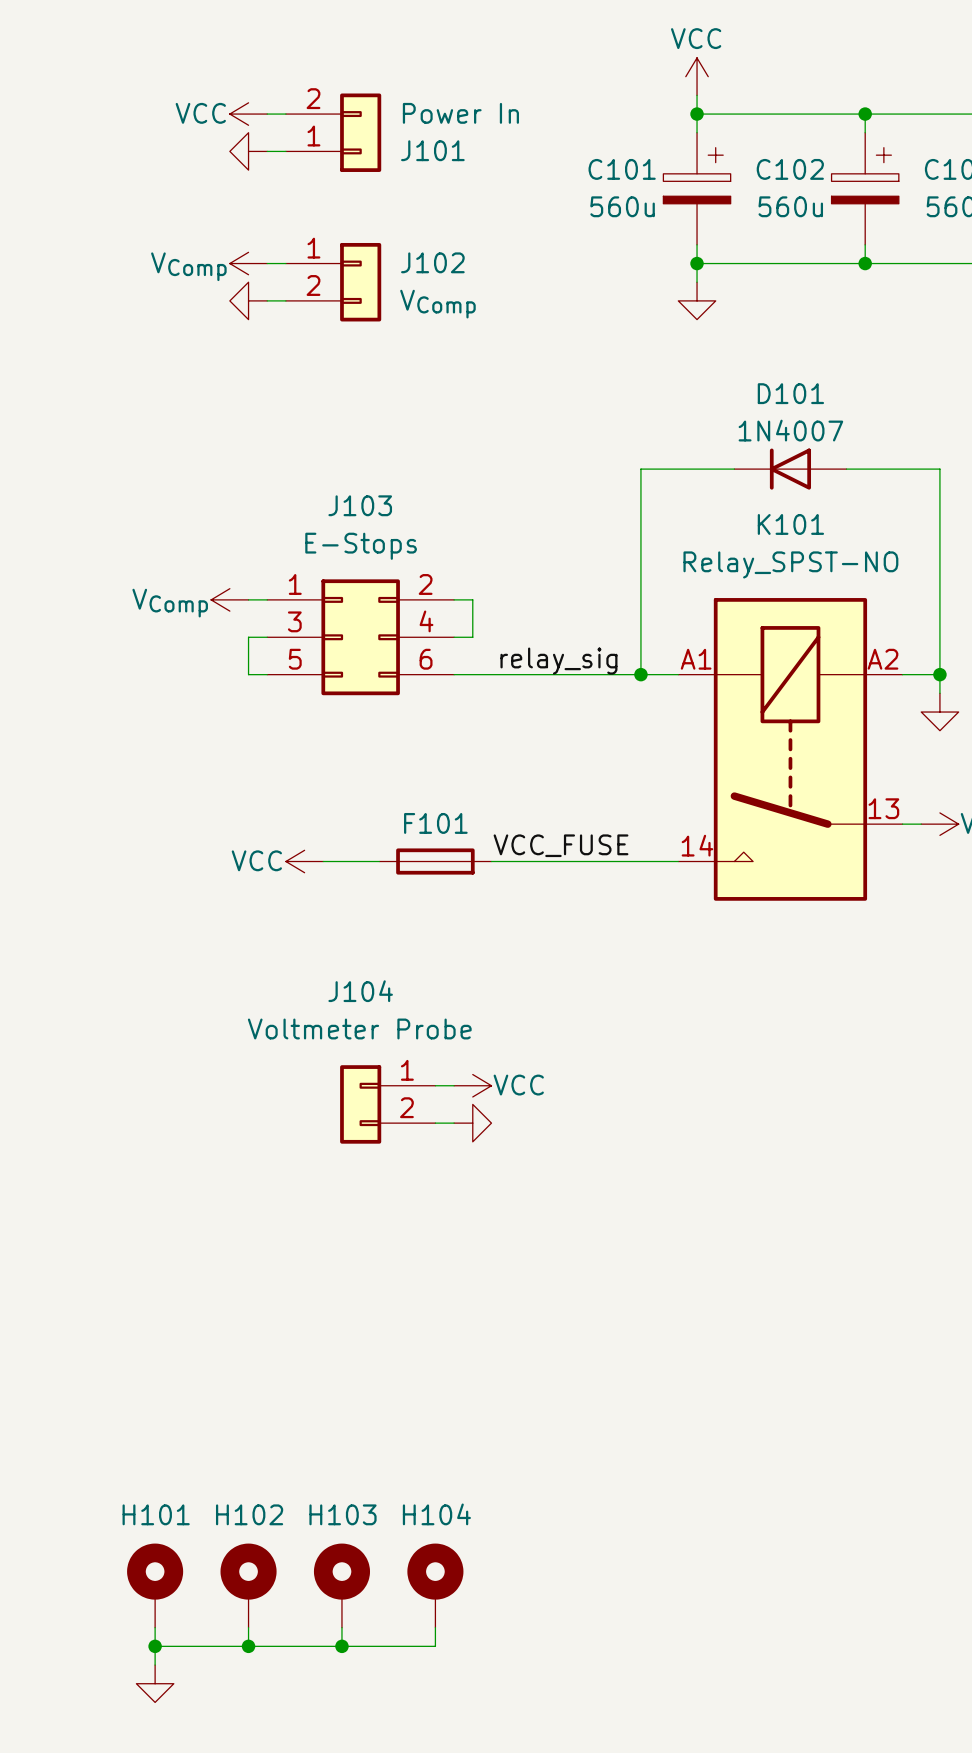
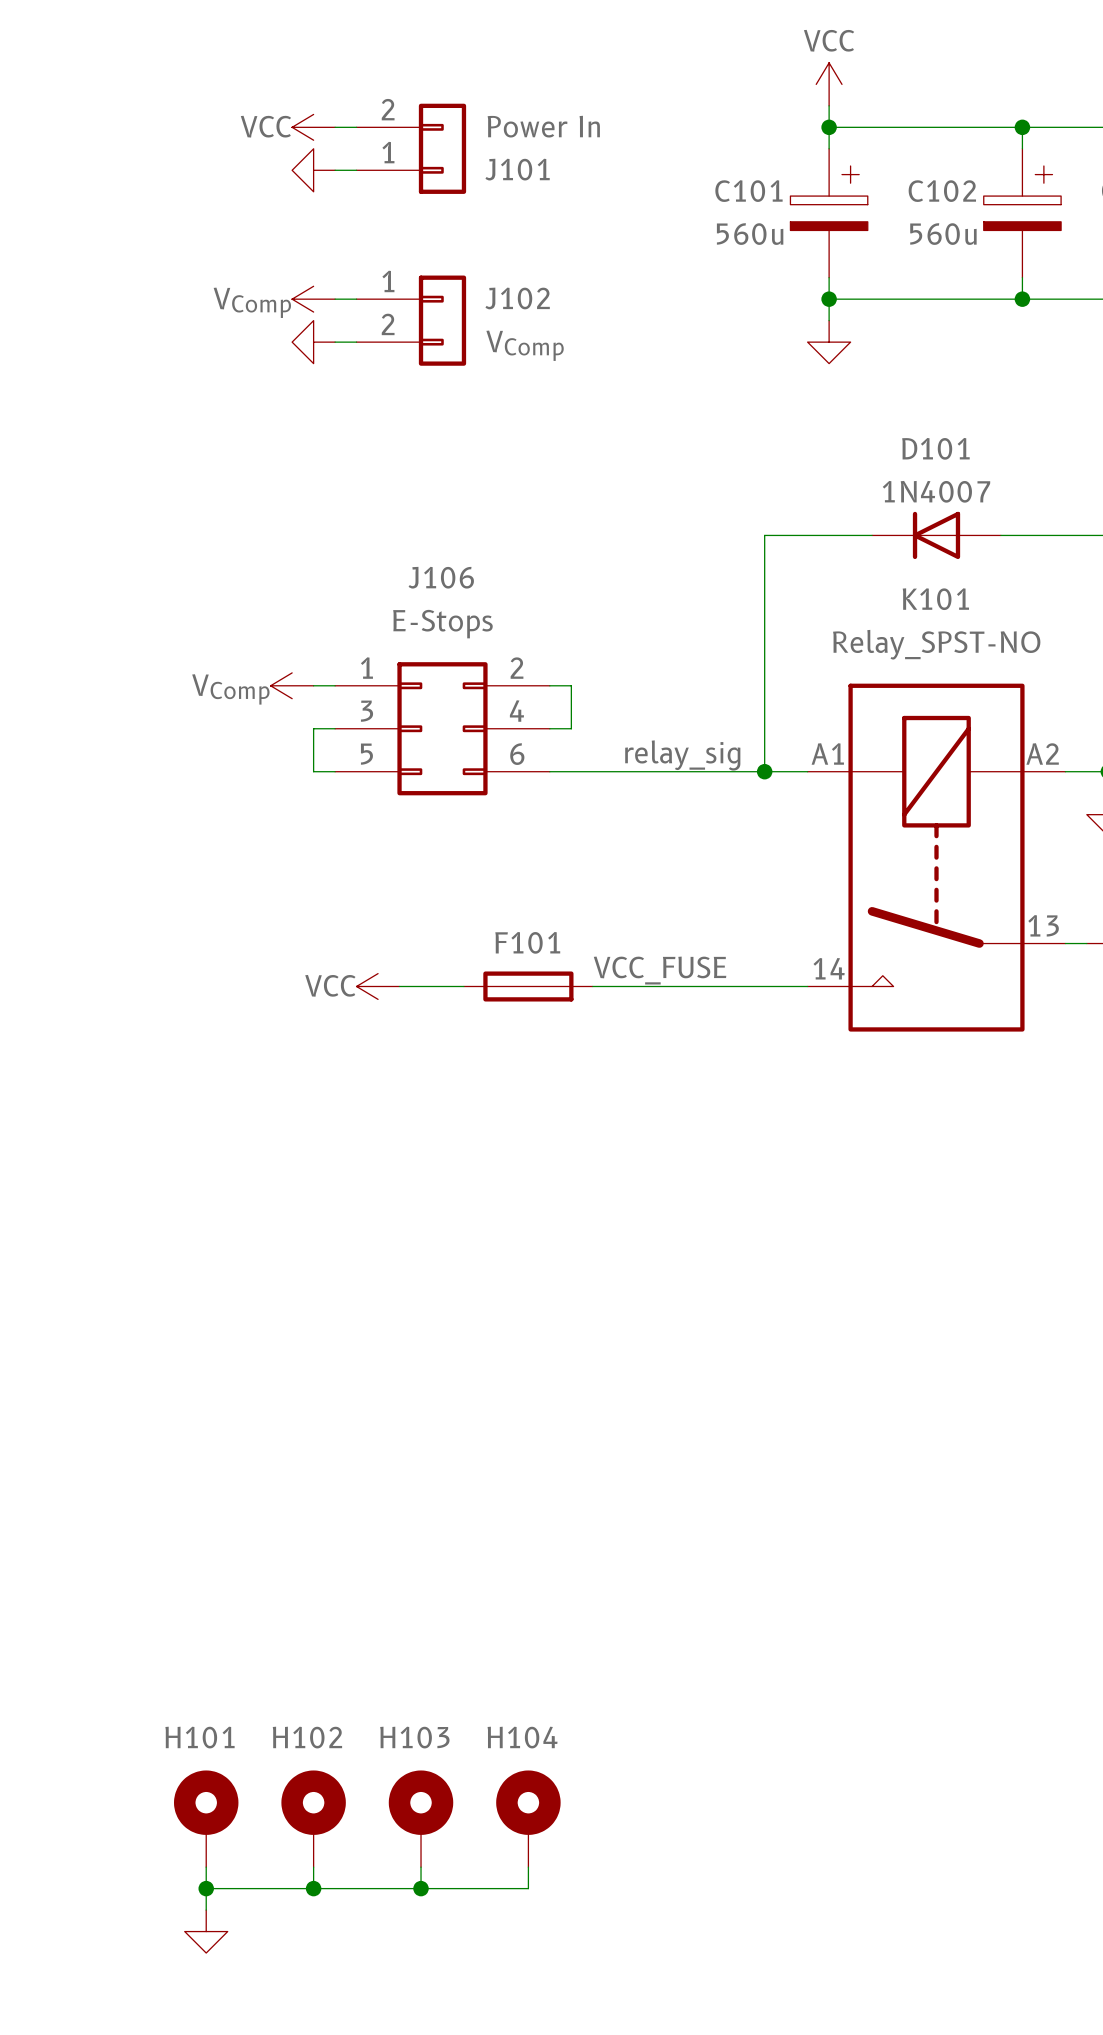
J103 name: J103 (360, 505) -> J106 (441, 577)
wire: (435, 1085) (454, 1085) -> none
power symbol: VCC (472, 1085) -> none
J104: Voltmeter Probe (387, 1104) -> none
wire: (435, 1123) (454, 1123) -> none
power symbol: (472, 1123) -> none

